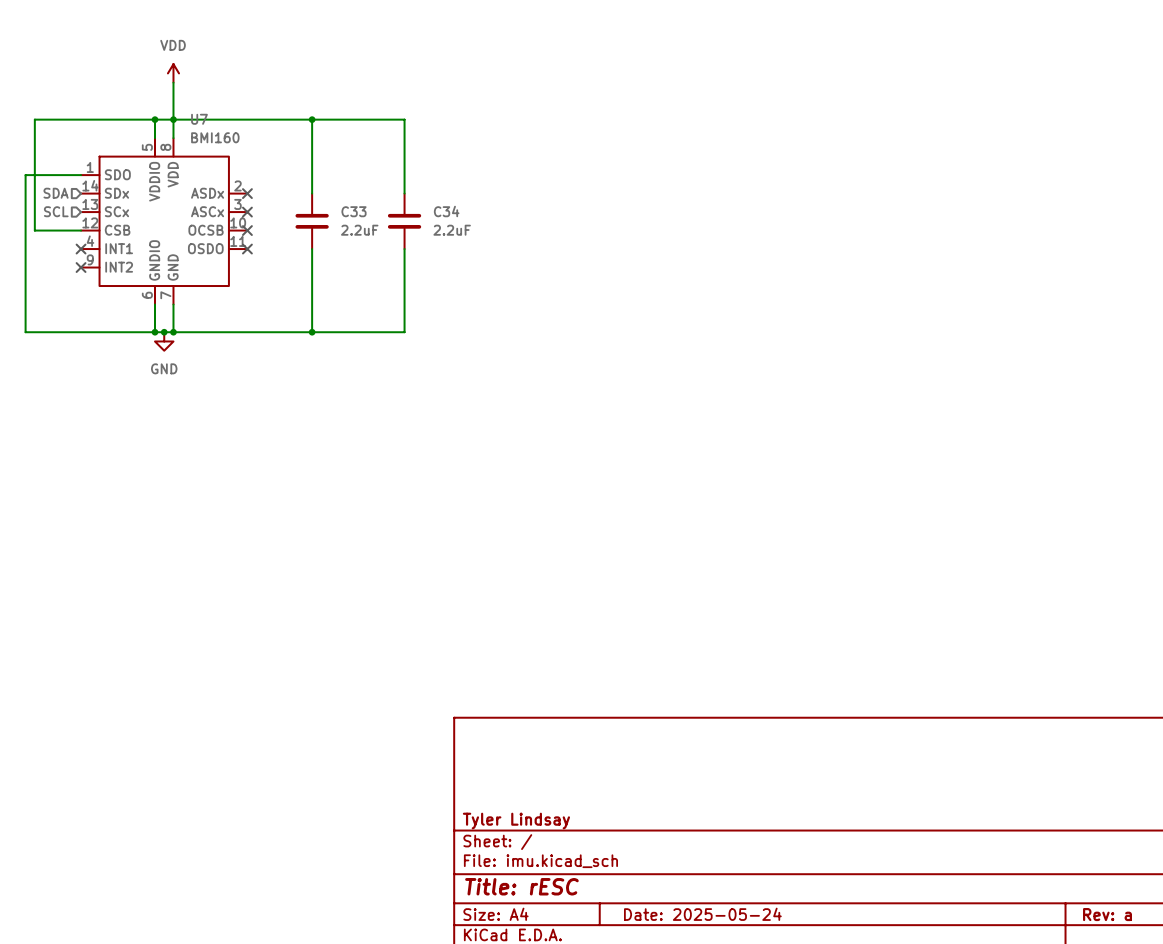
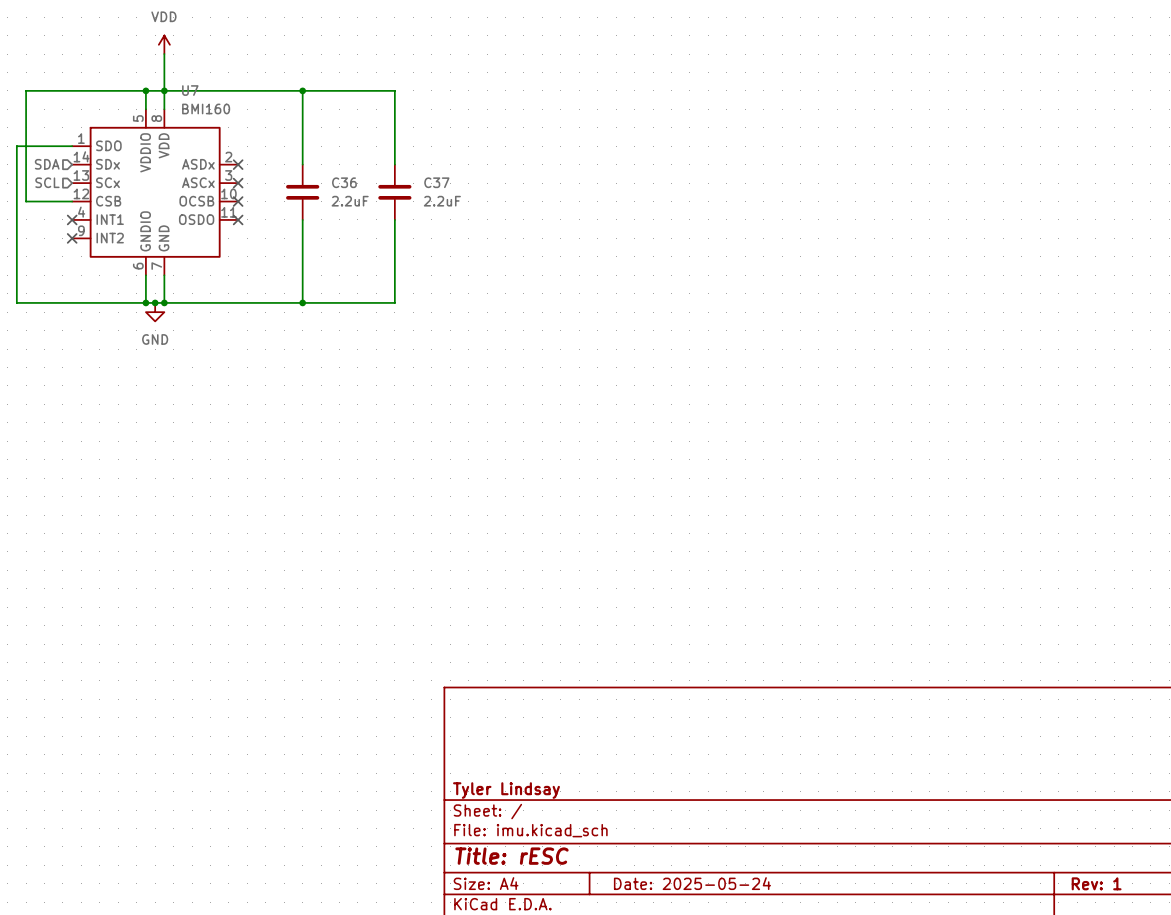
C33 name: C33 (354, 211) -> C36 (344, 182)
C34 name: C34 (446, 211) -> C37 (436, 182)
title block: Rev: a (1107, 914) -> Rev: 1 (1096, 883)

